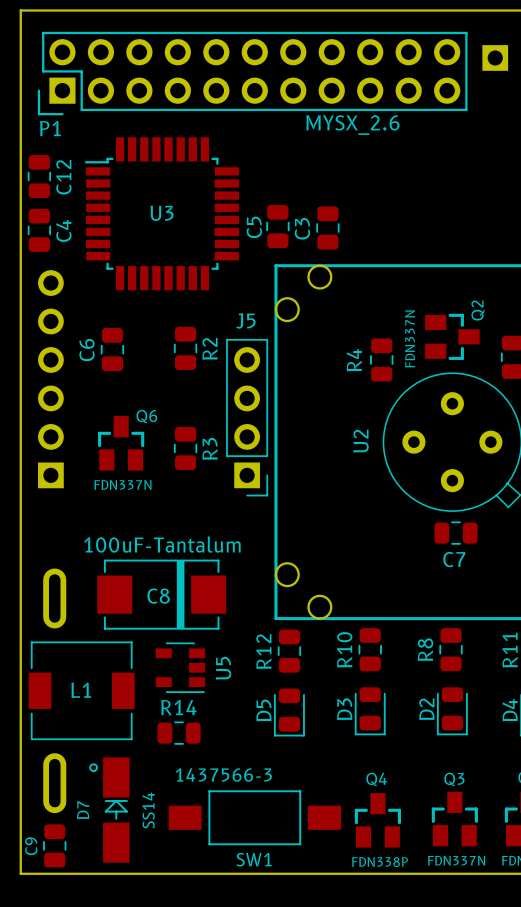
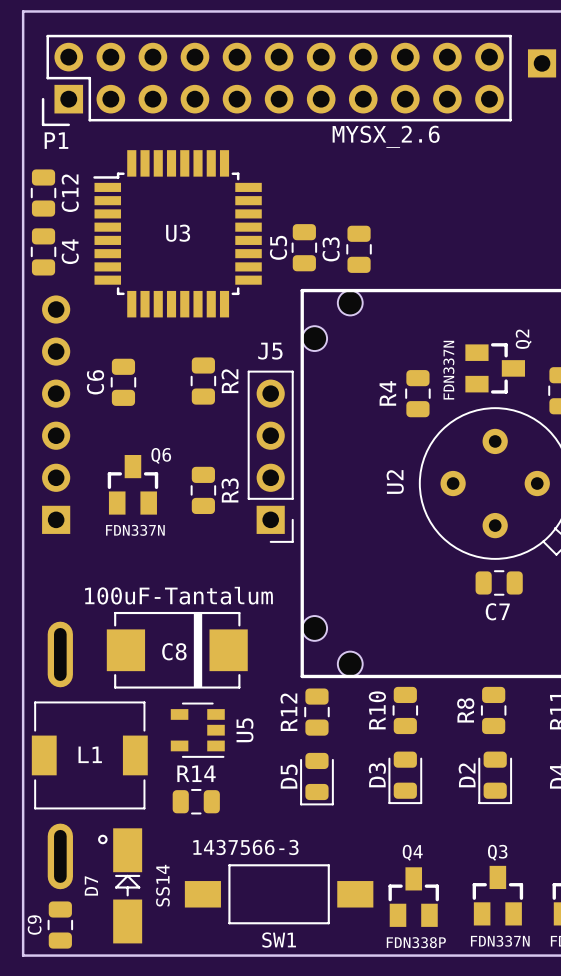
round board edge: [307, 264, 333, 290] -> none
part: none -> (350, 302)
round board edge: [274, 297, 300, 323] -> none
part: none -> (314, 338)
round board edge: [274, 562, 300, 588] -> none
part: none -> (314, 628)
round board edge: [307, 594, 333, 620] -> none
part: none -> (350, 664)

